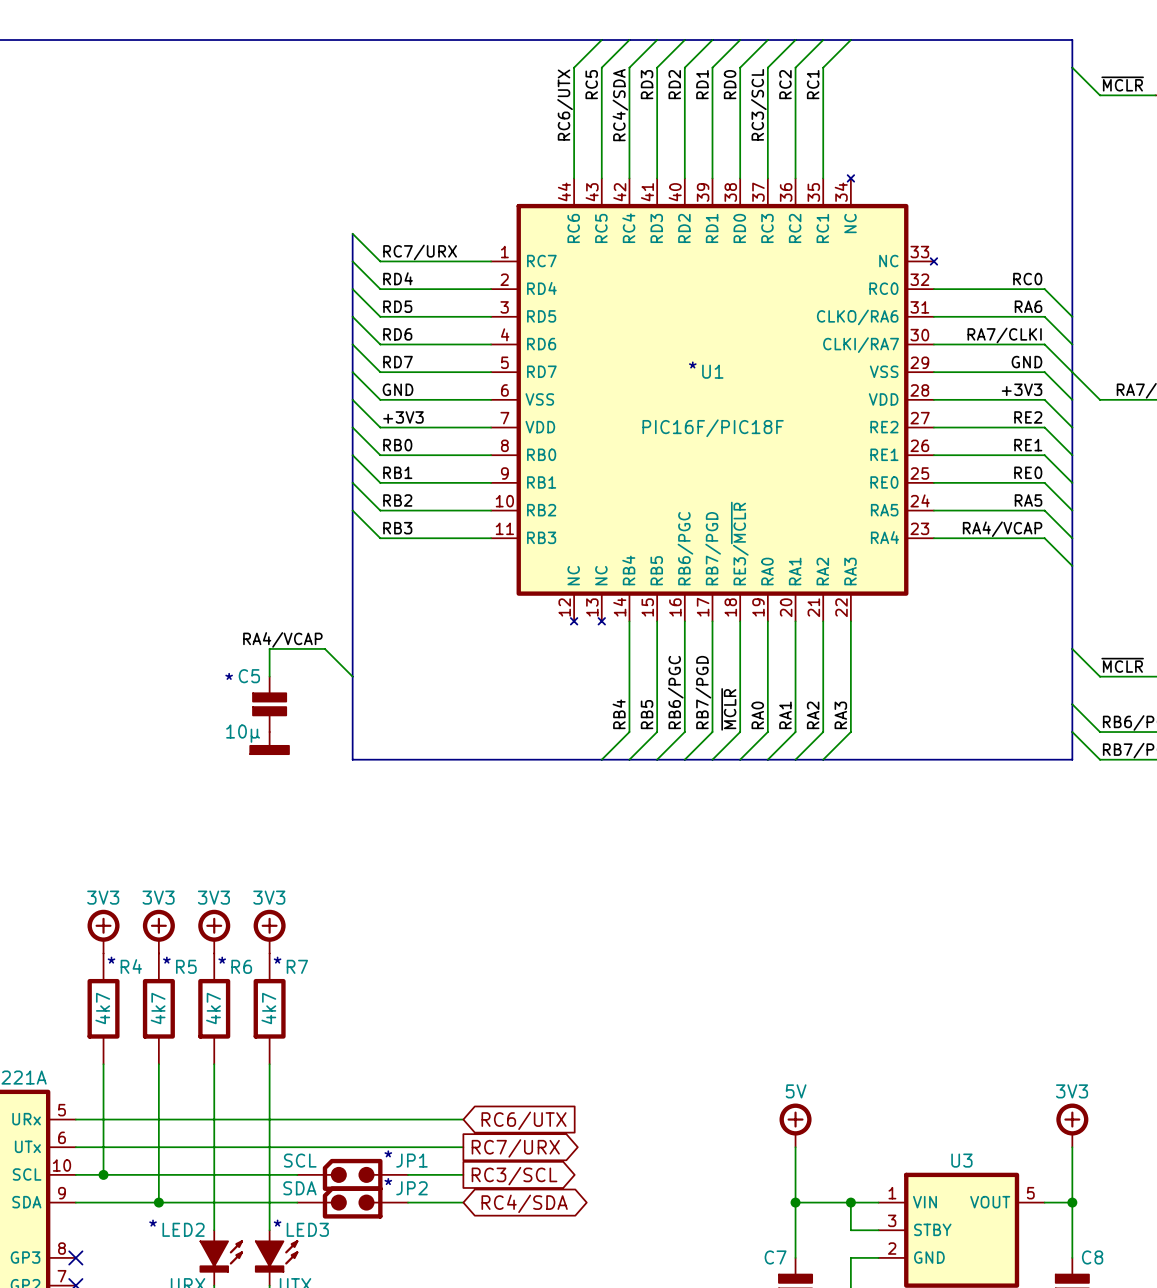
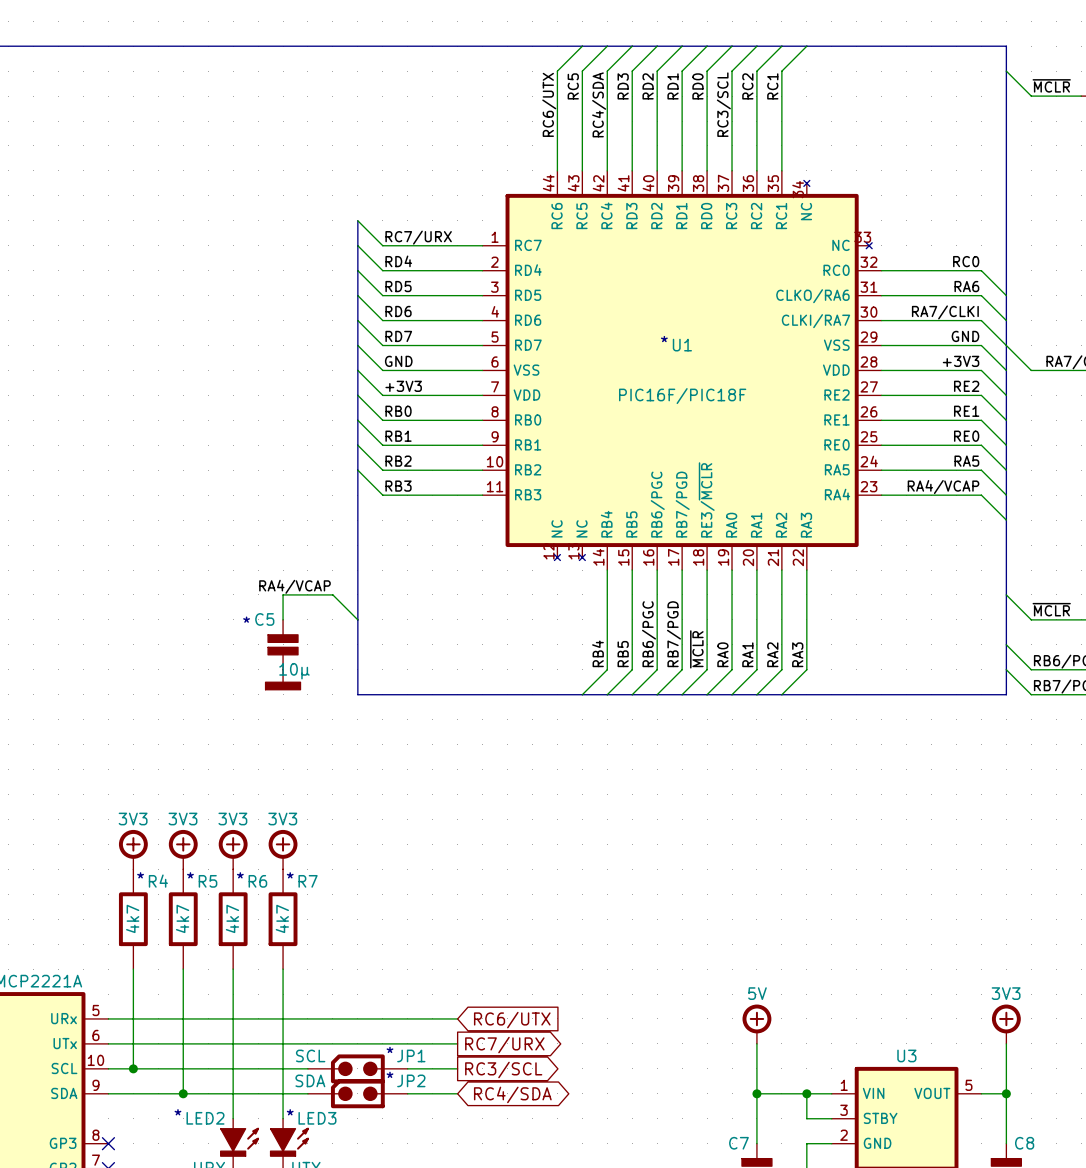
U1 symbol: [491, 175, 938, 625] -> [482, 170, 882, 571]
C5 value position: 10µ (243, 733) -> 10µ (294, 671)

